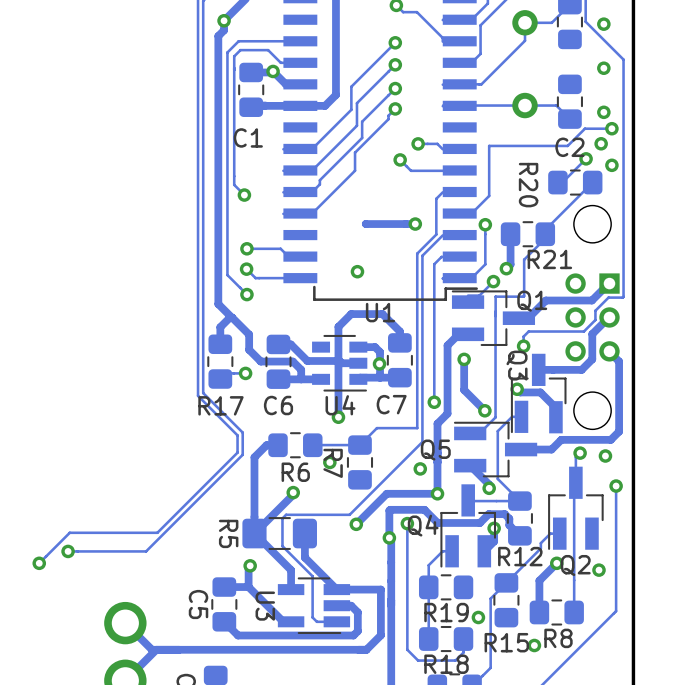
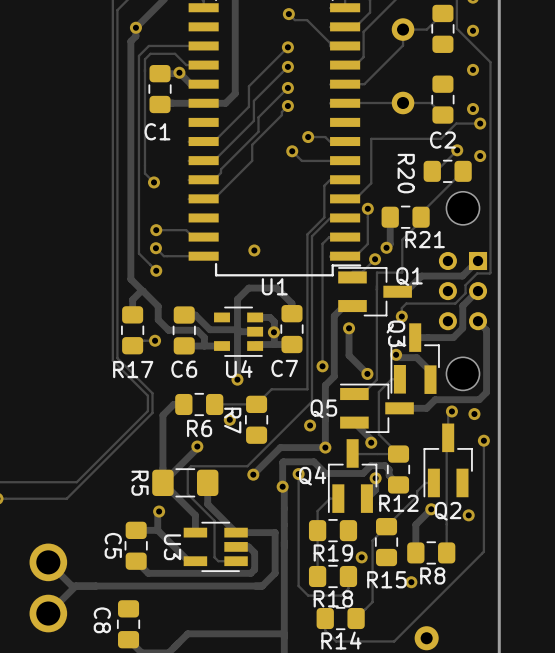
via: (601, 143) -> none
track: (415, 224) (365, 224) -> none
via: (415, 224) -> none

